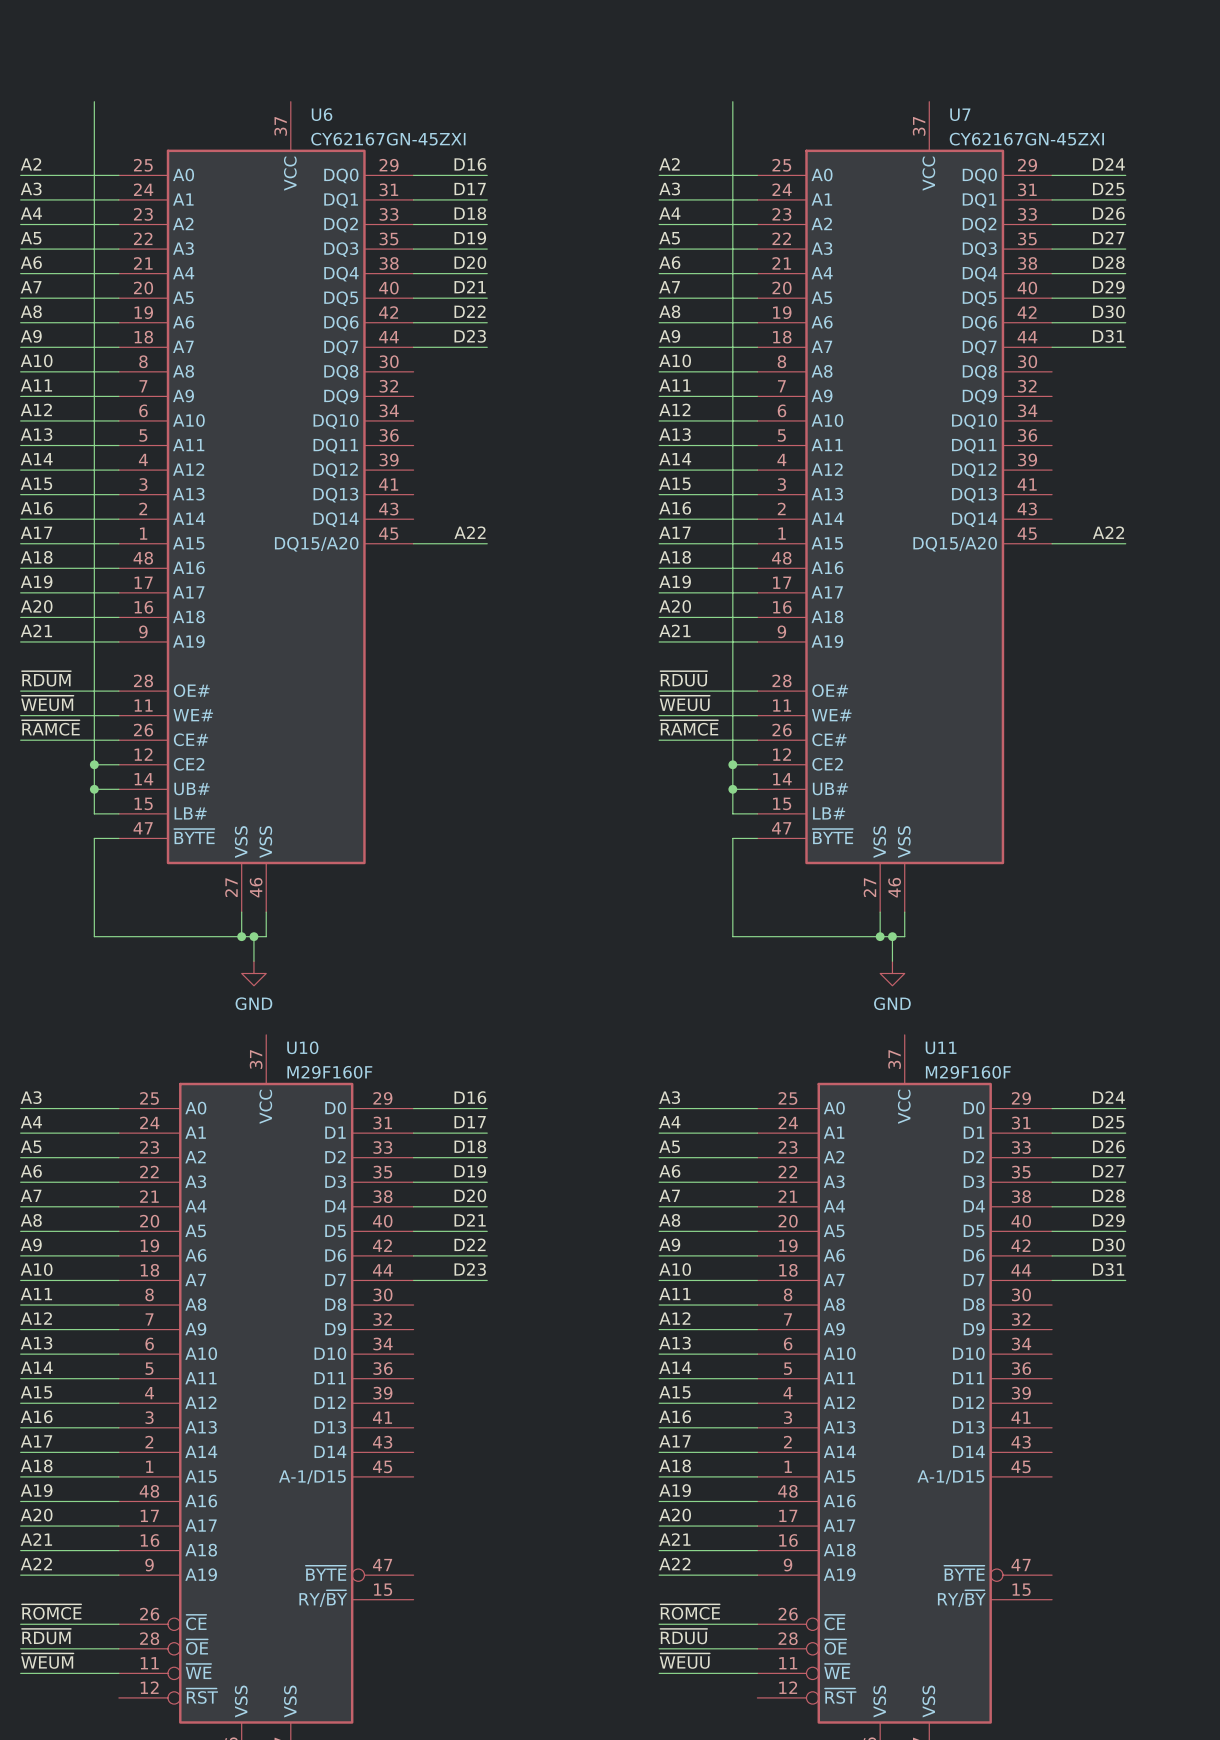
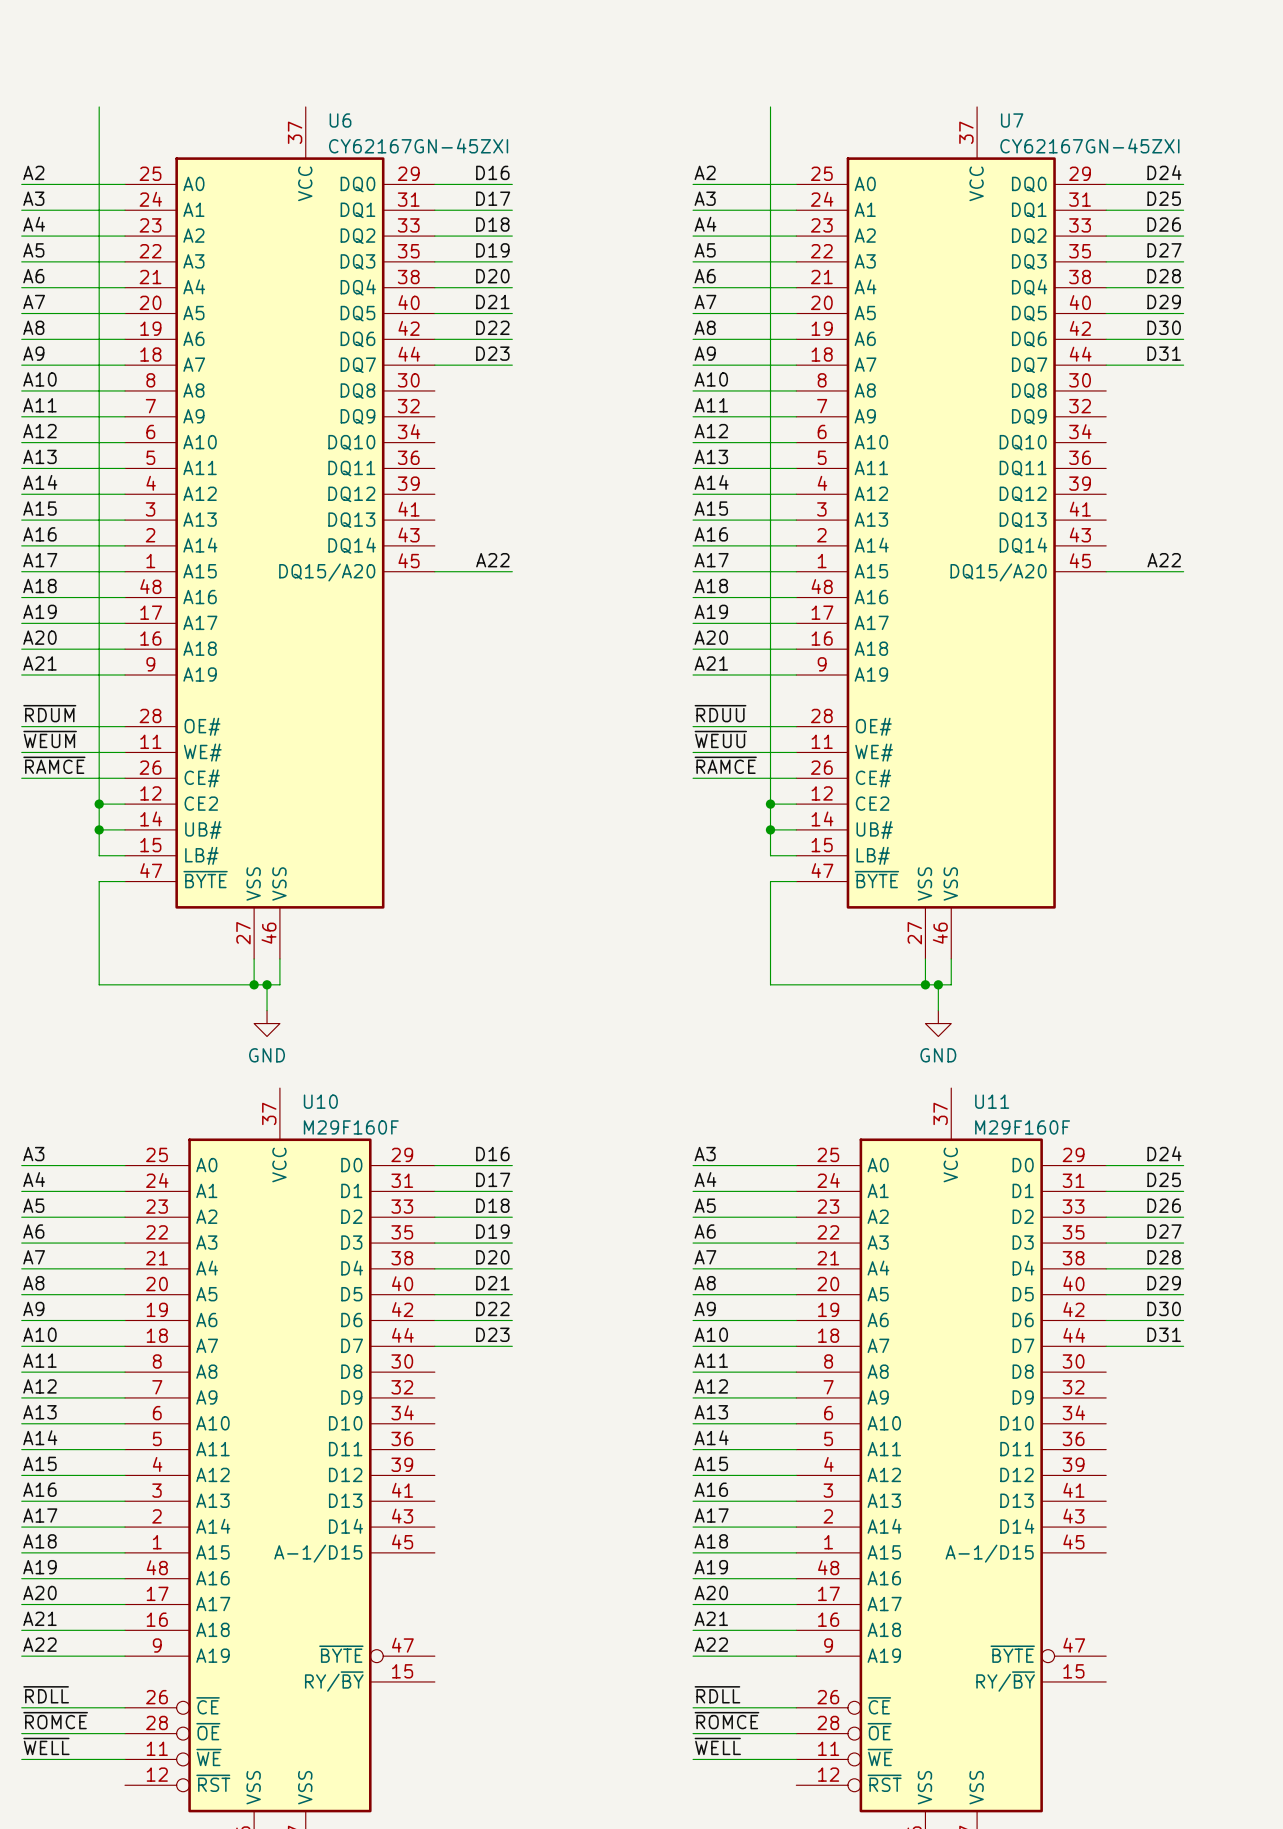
label: ~{ROMCE} (51, 1612) -> ~{RDLL} (46, 1694)
label: ~{ROMCE} (690, 1612) -> ~{RDLL} (717, 1694)
label: ~{RDUM} (46, 1636) -> ~{ROMCE} (55, 1720)
label: ~{RDUU} (683, 1636) -> ~{ROMCE} (726, 1720)
label: ~{WEUM} (47, 1661) -> ~{WELL} (46, 1746)
label: ~{WEUU} (684, 1661) -> ~{WELL} (717, 1746)

